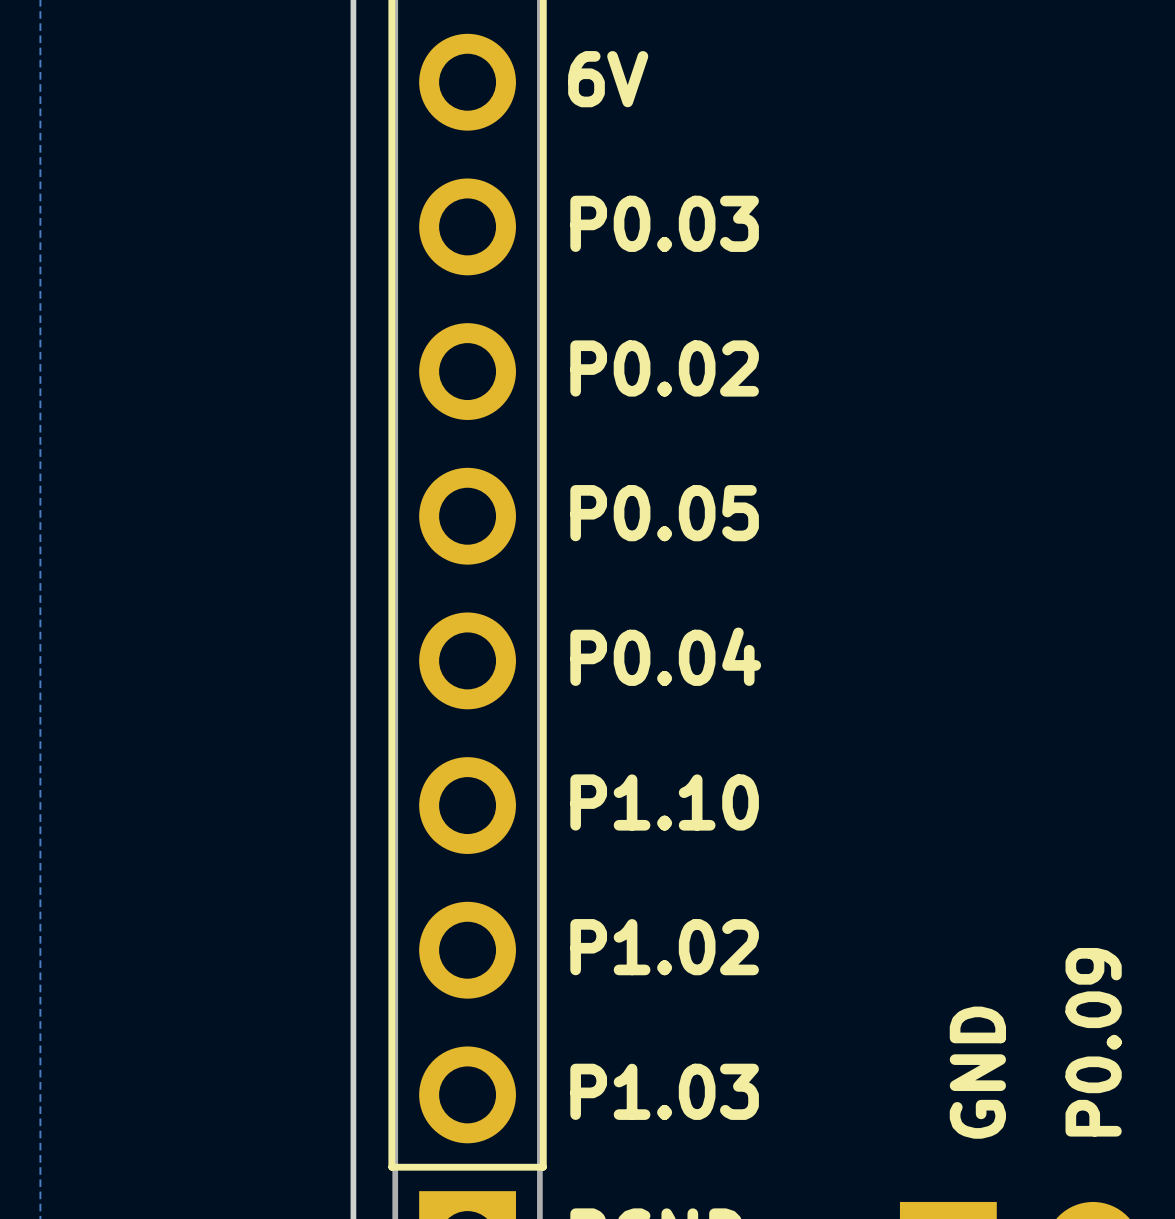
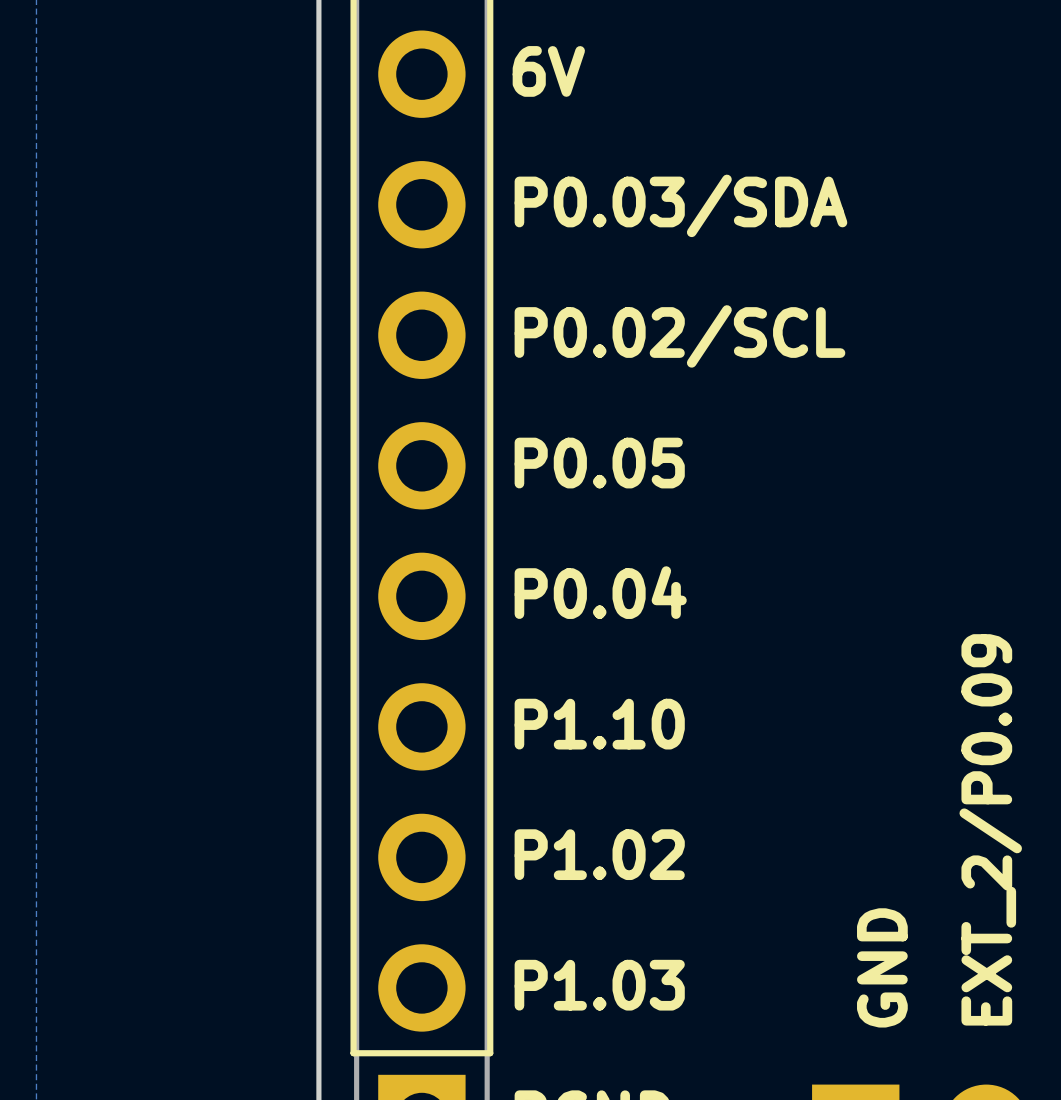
text: P0.03 (664, 223) -> P0.03/SDA (680, 205)
text: P0.02 (664, 368) -> P0.02/SCL (679, 336)
text: P0.09 (1093, 1042) -> EXT_2/P0.09 (990, 829)

